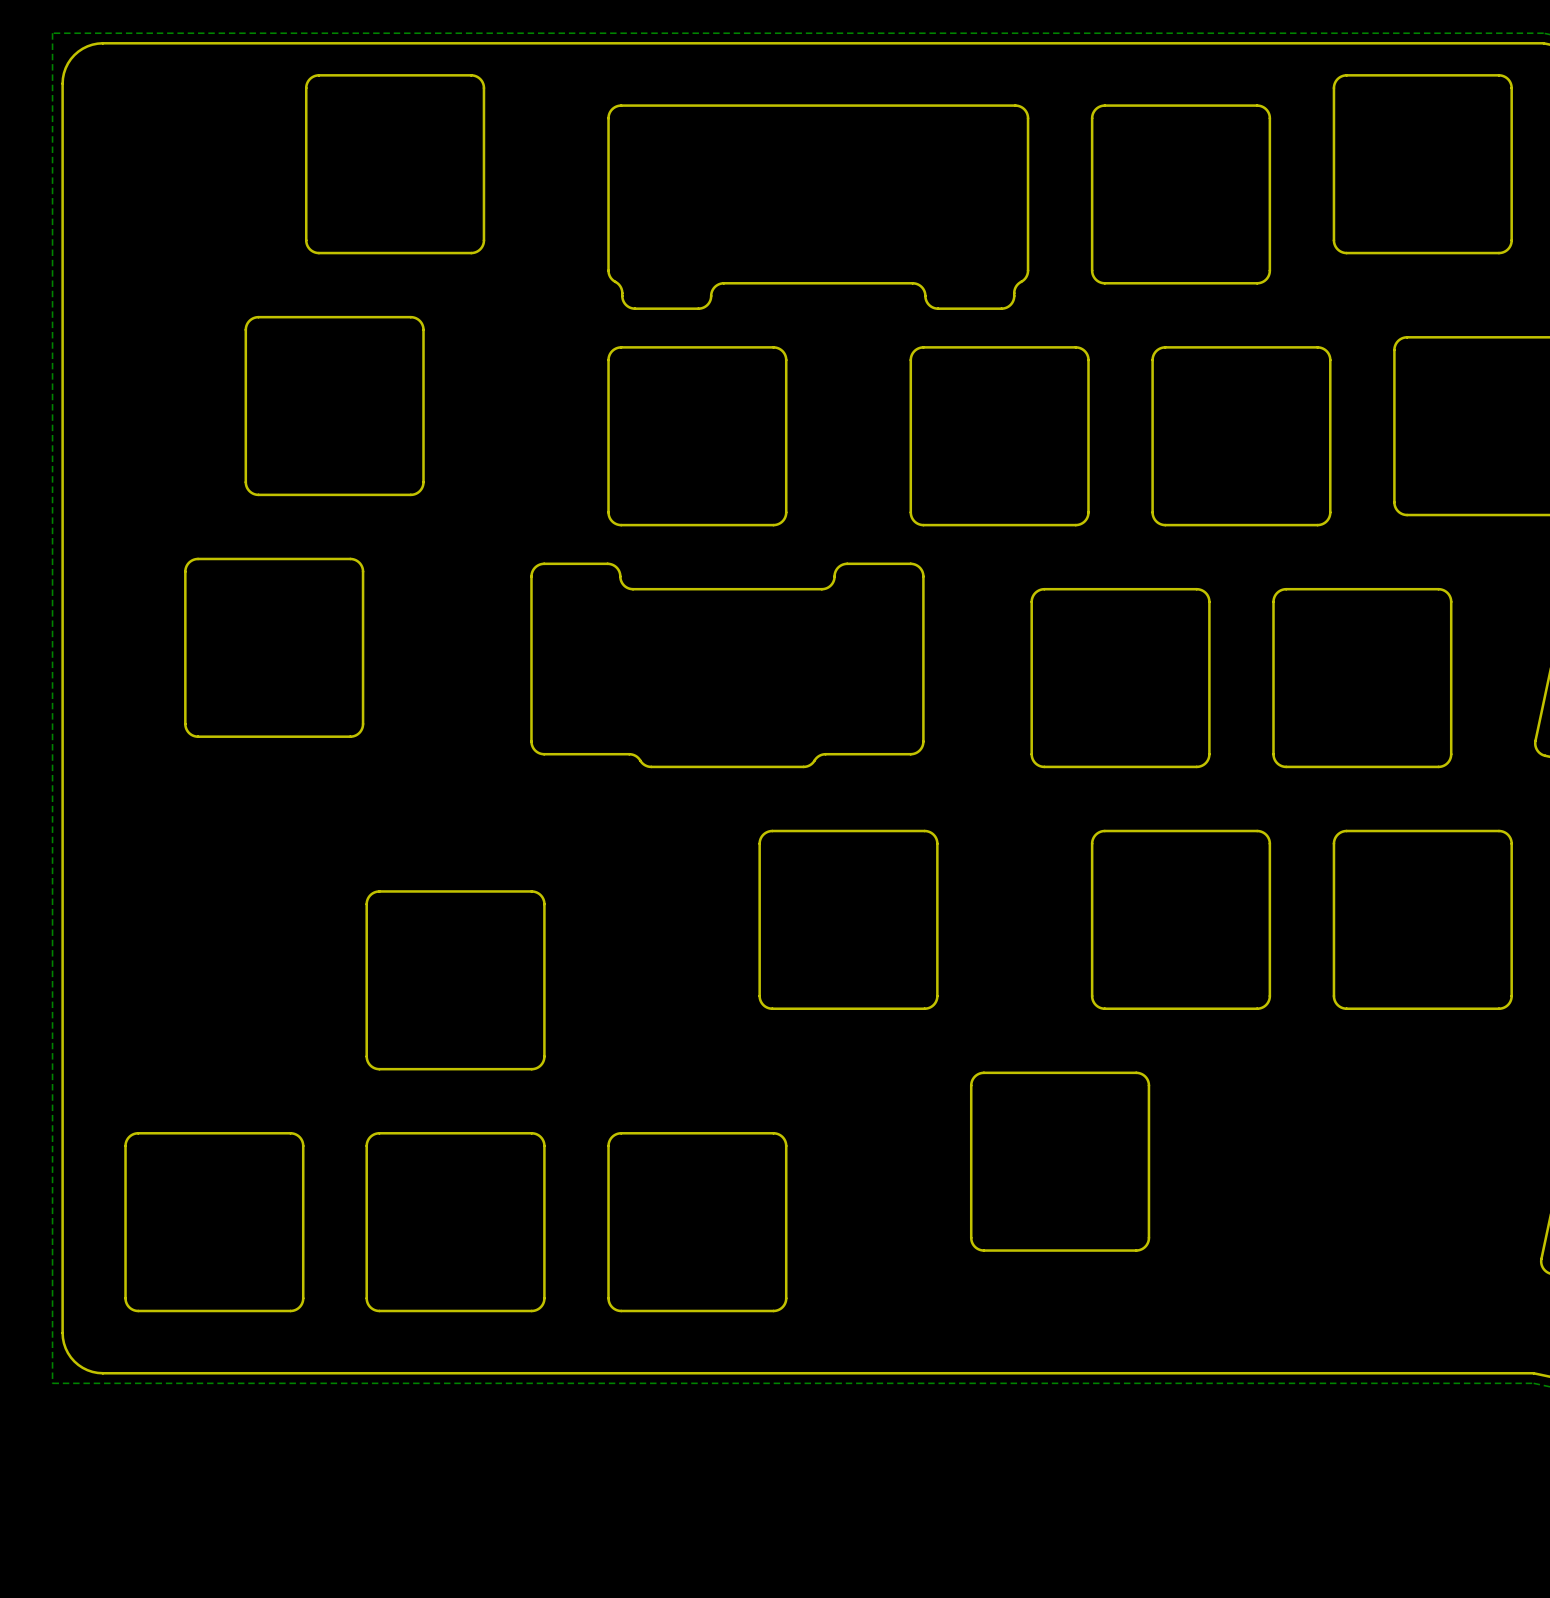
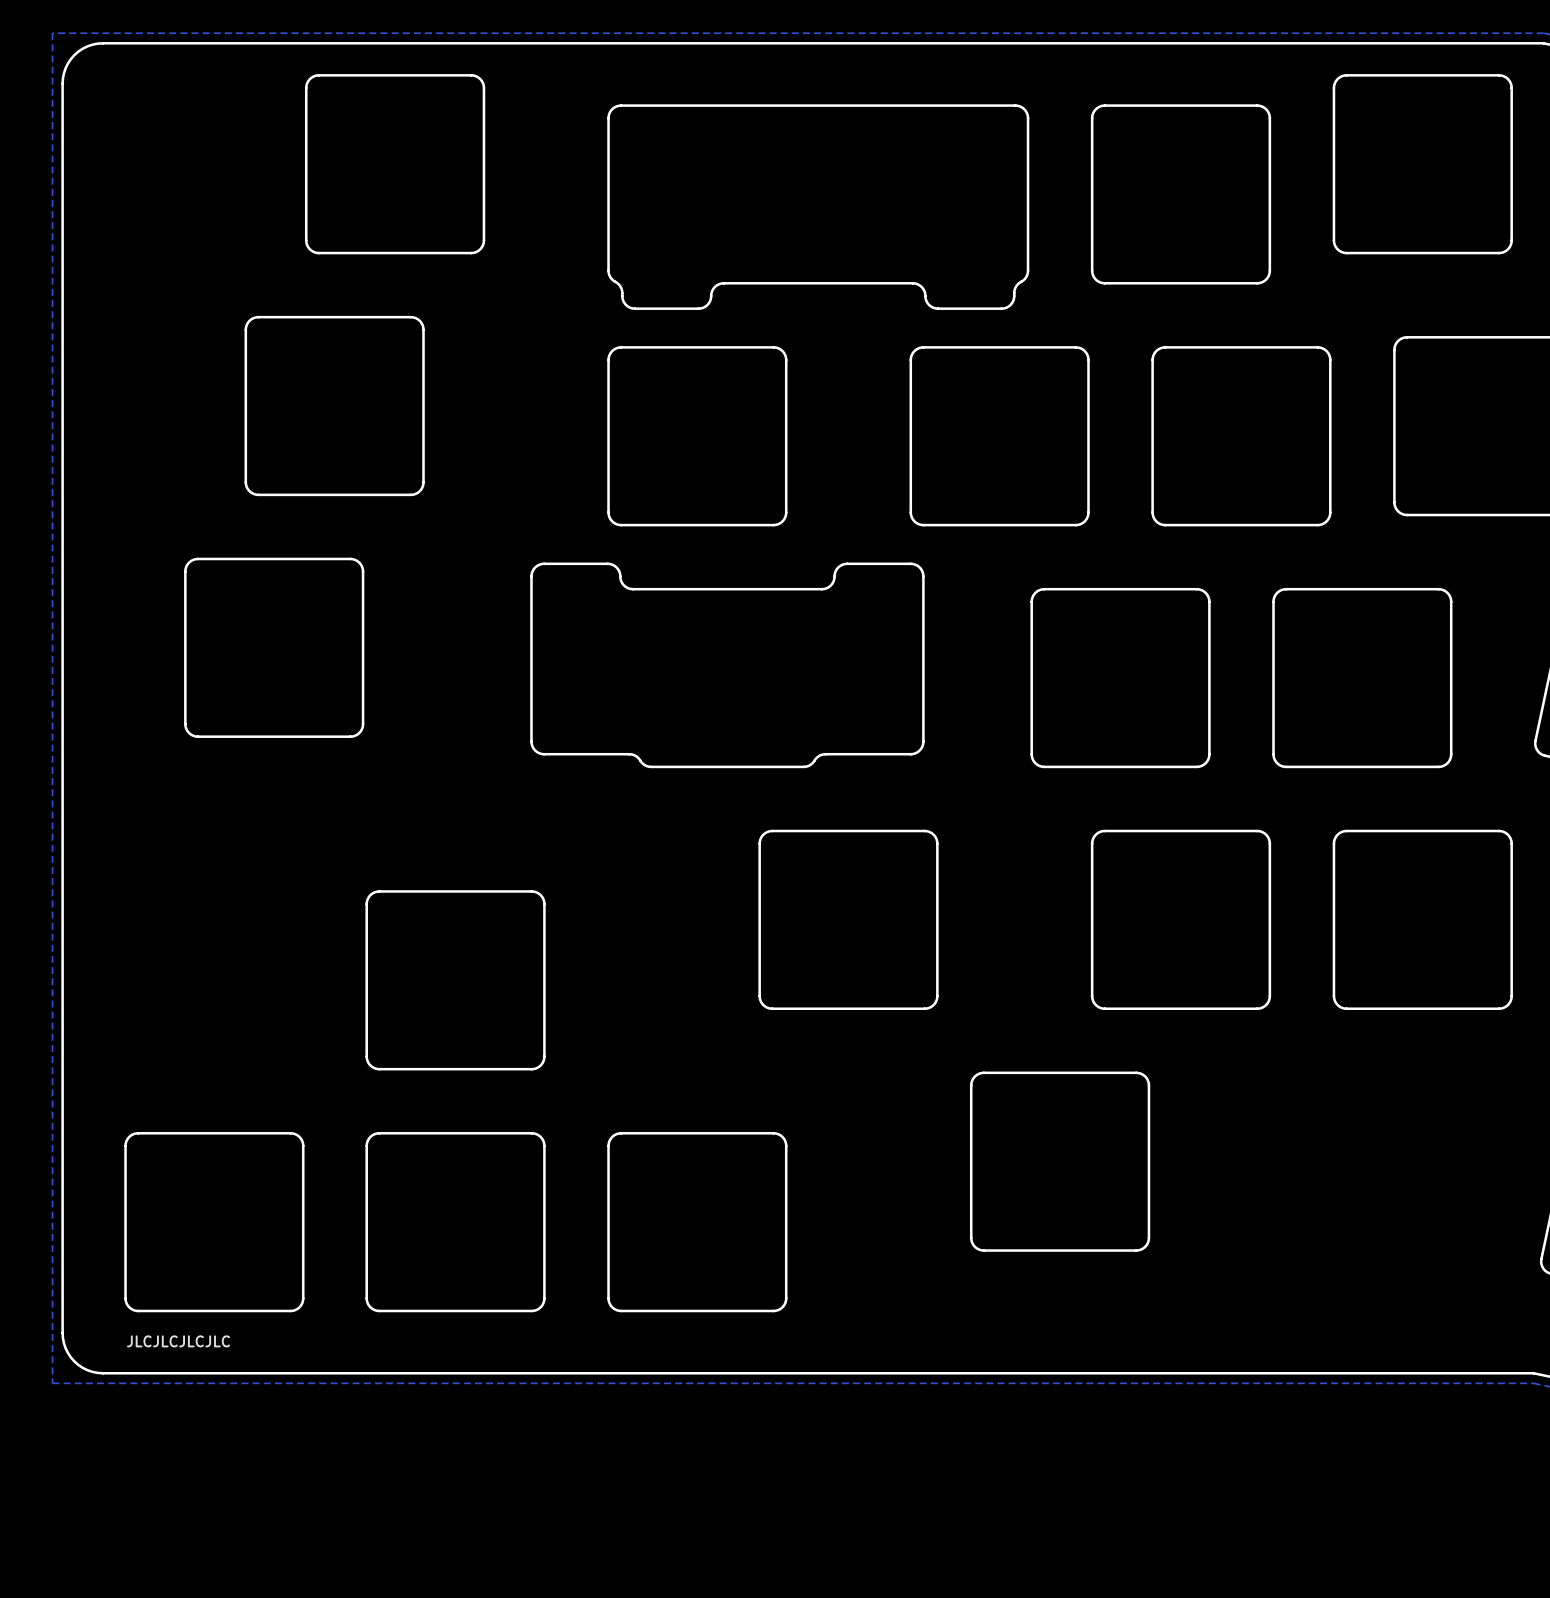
text: none -> JLCJLCJLCJLC (178, 1341)

